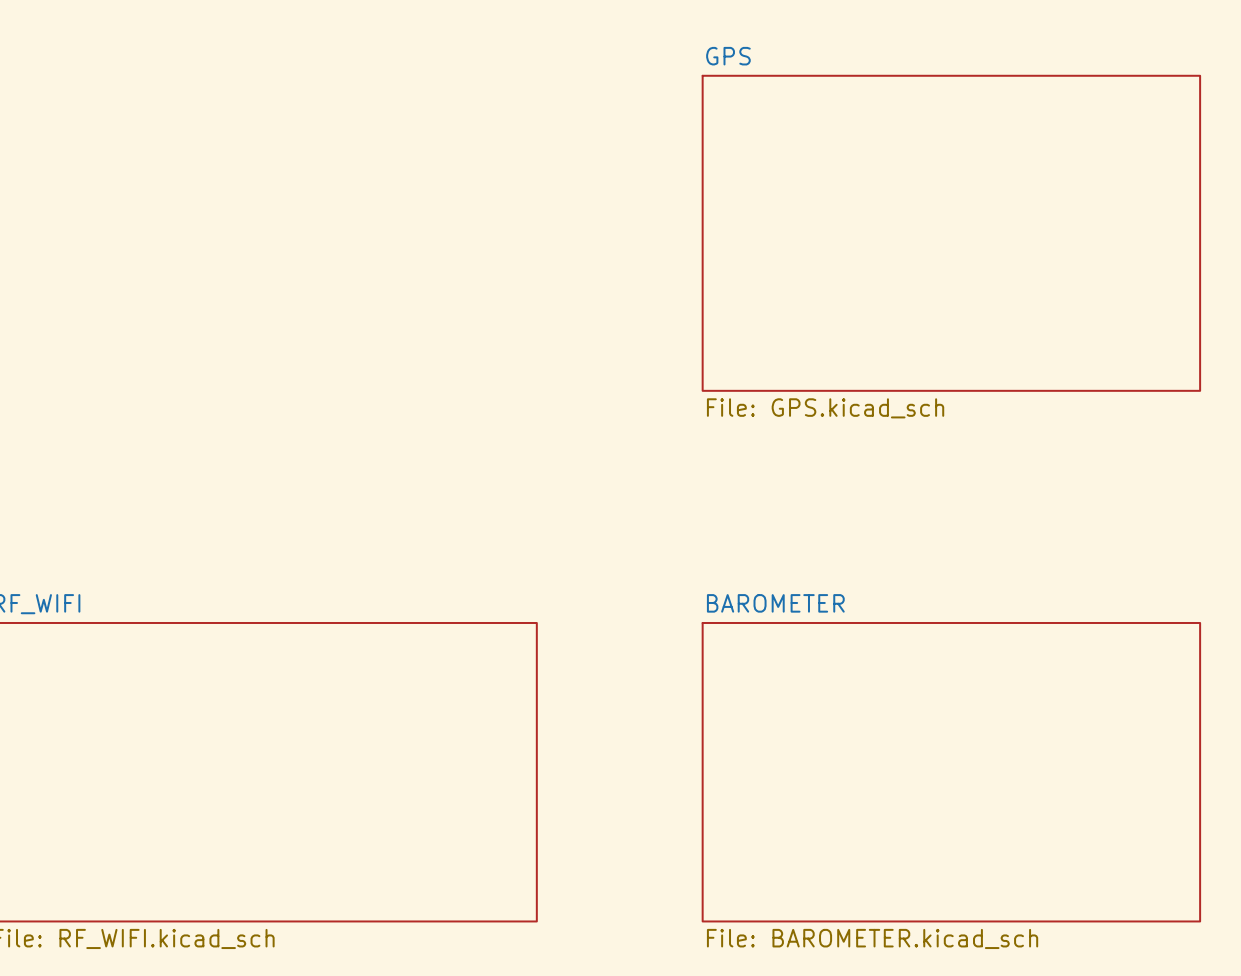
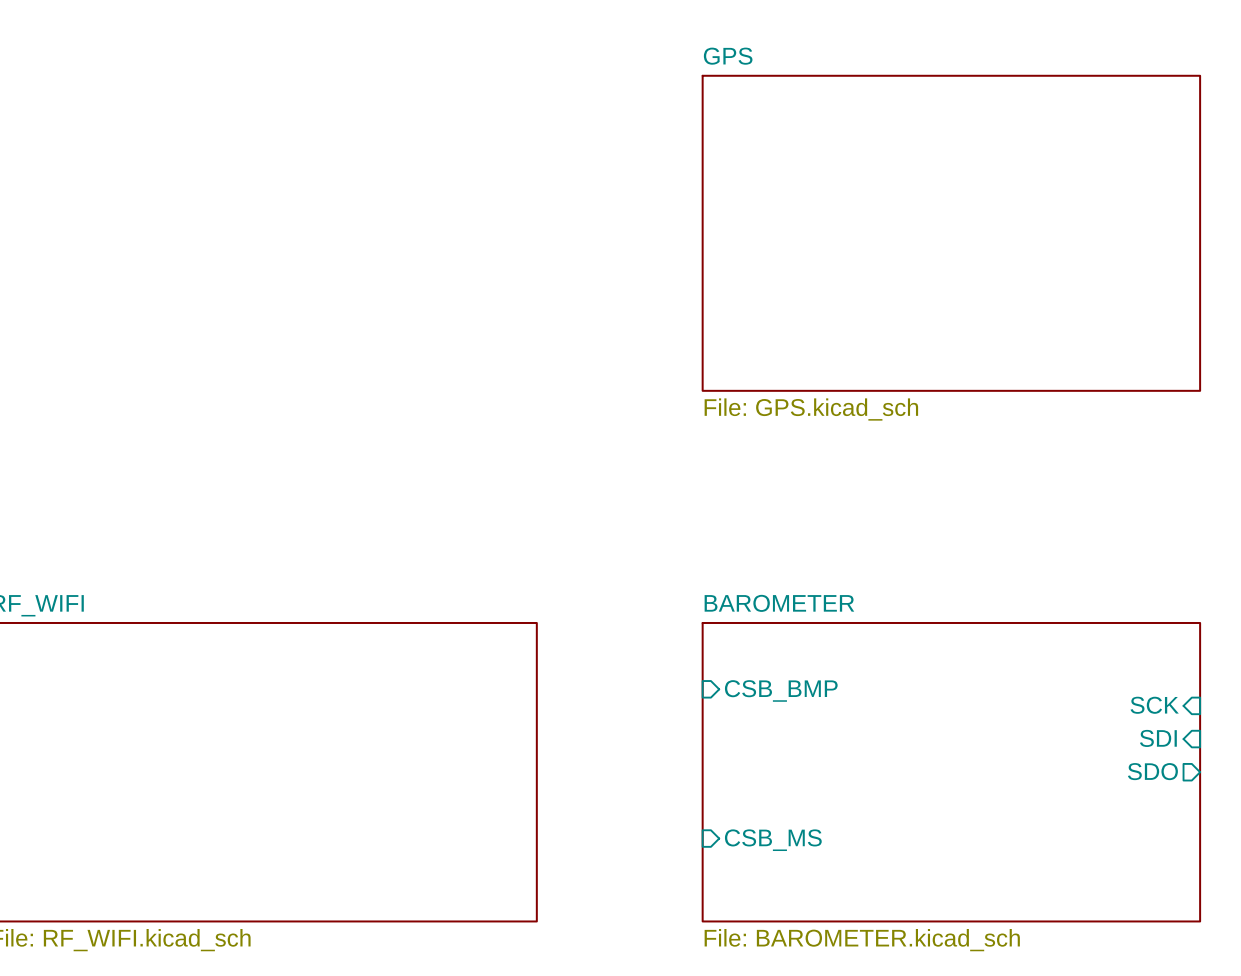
sheet pin: none -> CSB_BMP (781, 690)
sheet pin: none -> SCK (1154, 705)
sheet pin: none -> SDI (1158, 738)
sheet pin: none -> SDO (1152, 771)
sheet pin: none -> CSB_MS (773, 840)

